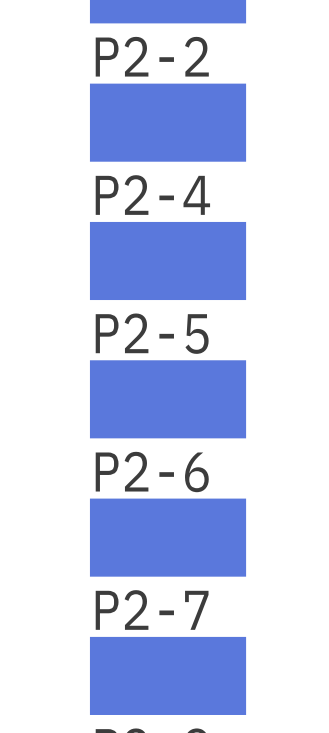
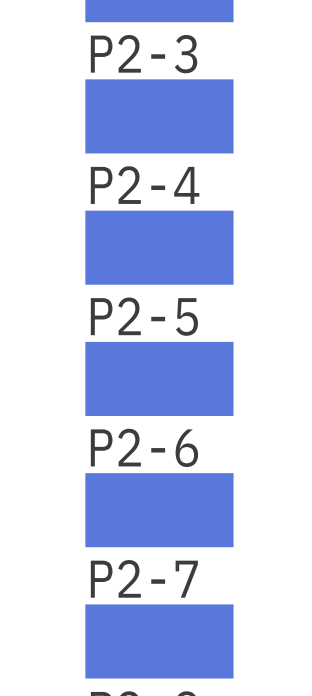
P2-2 name: P2-2 (152, 56) -> P2-3 (144, 54)

